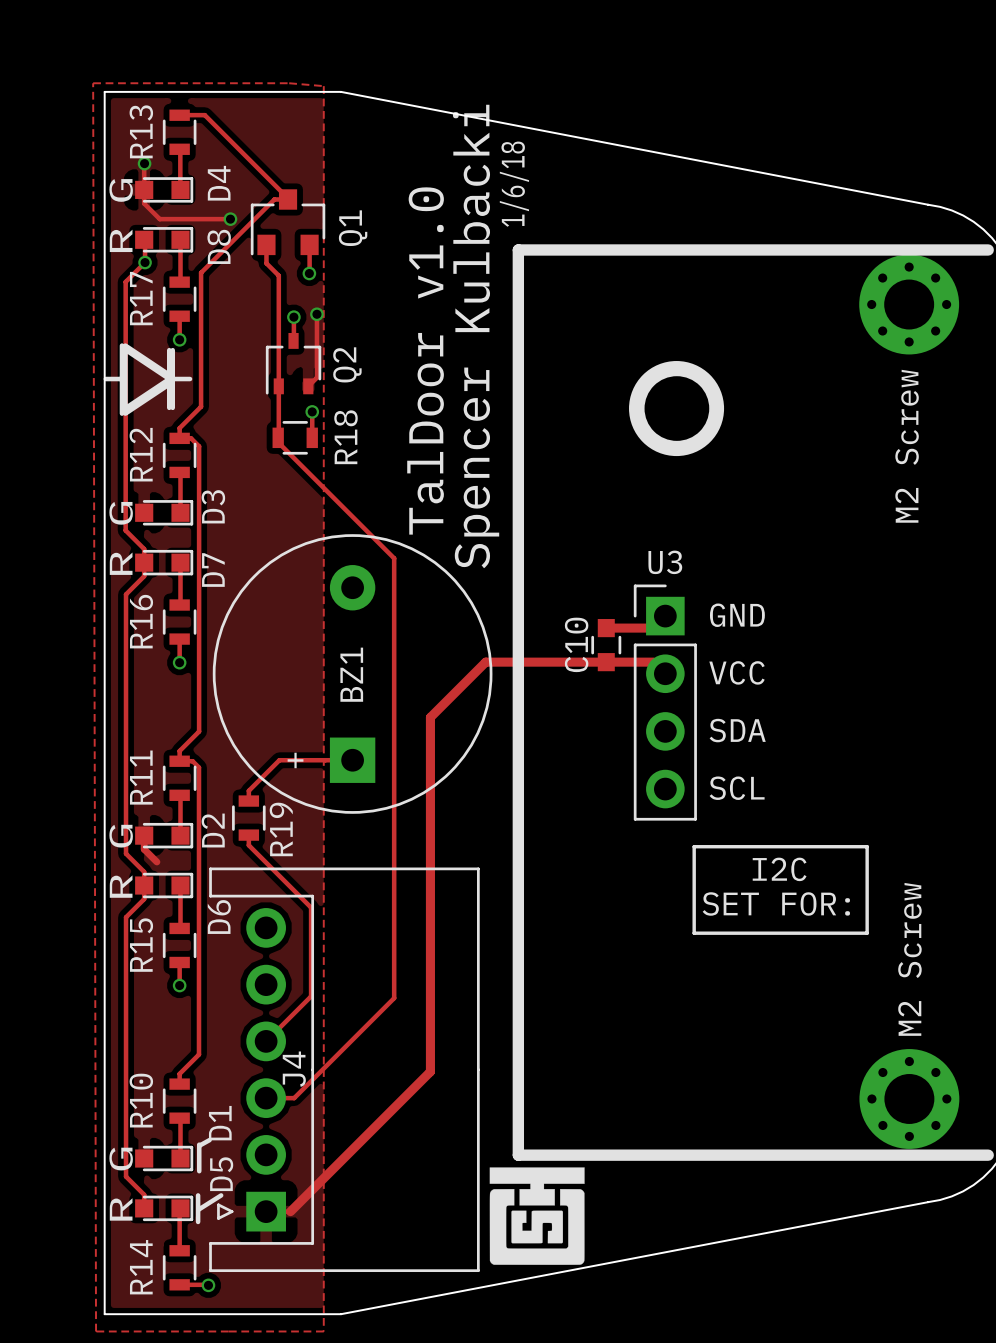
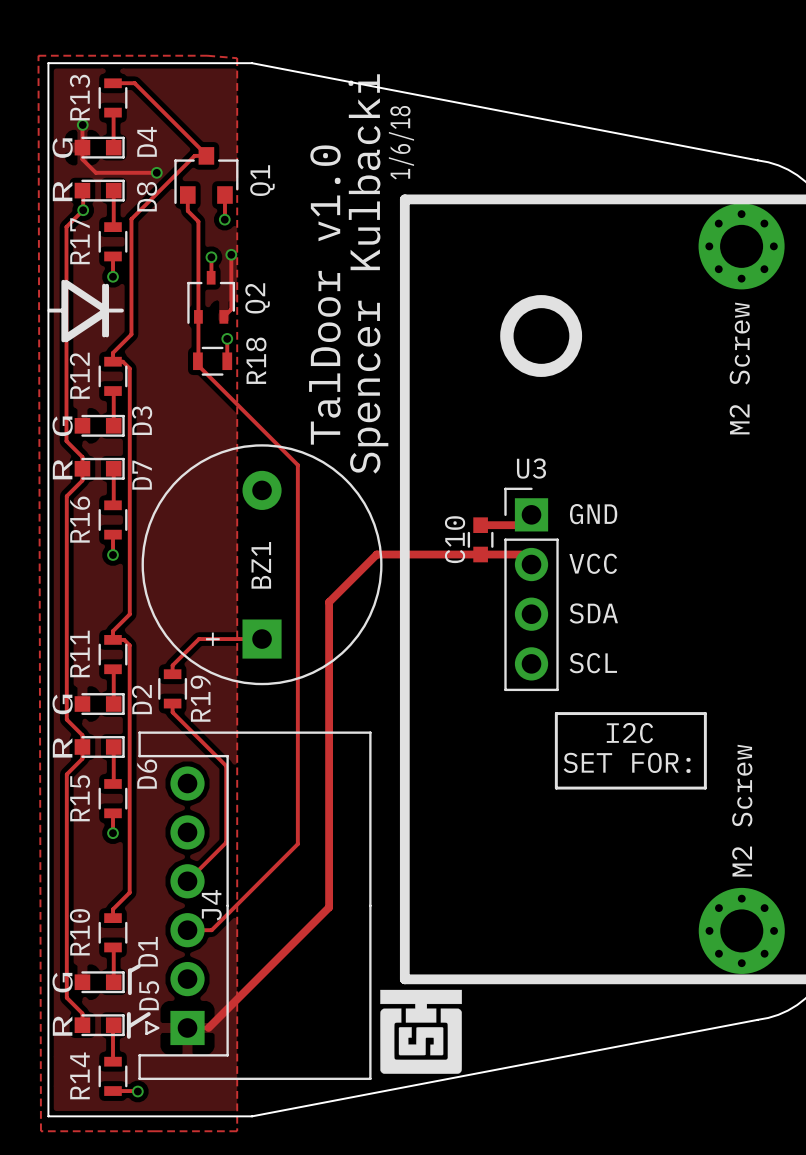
track: (144, 835) (144, 849) (156, 861) -> none

